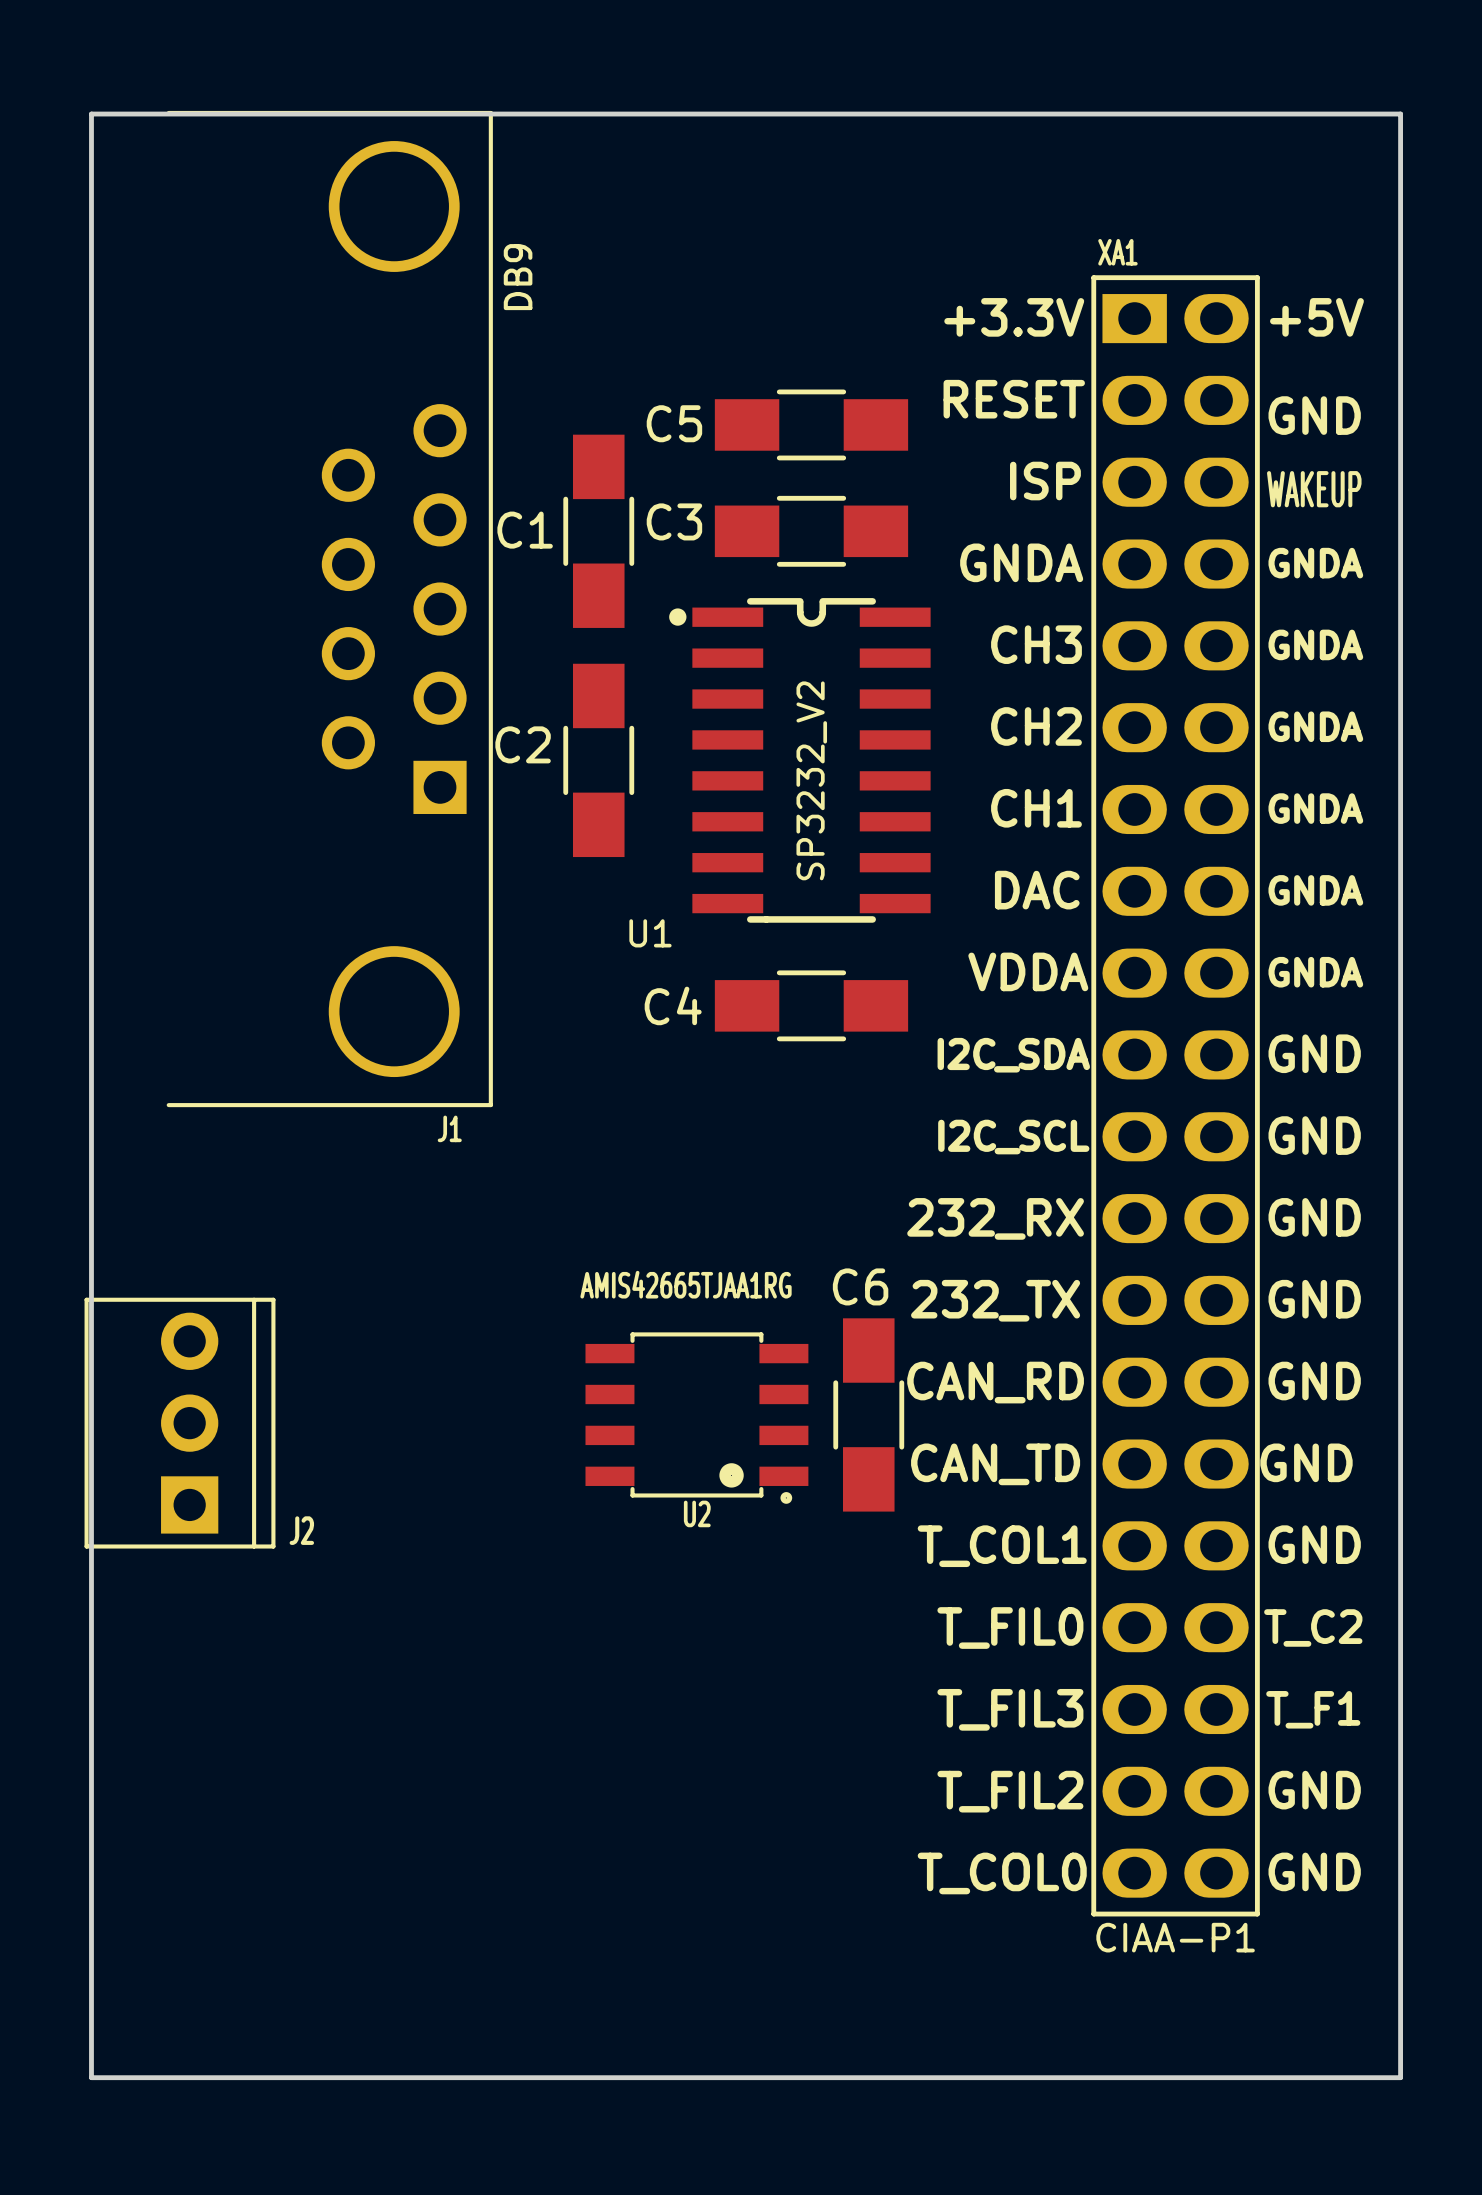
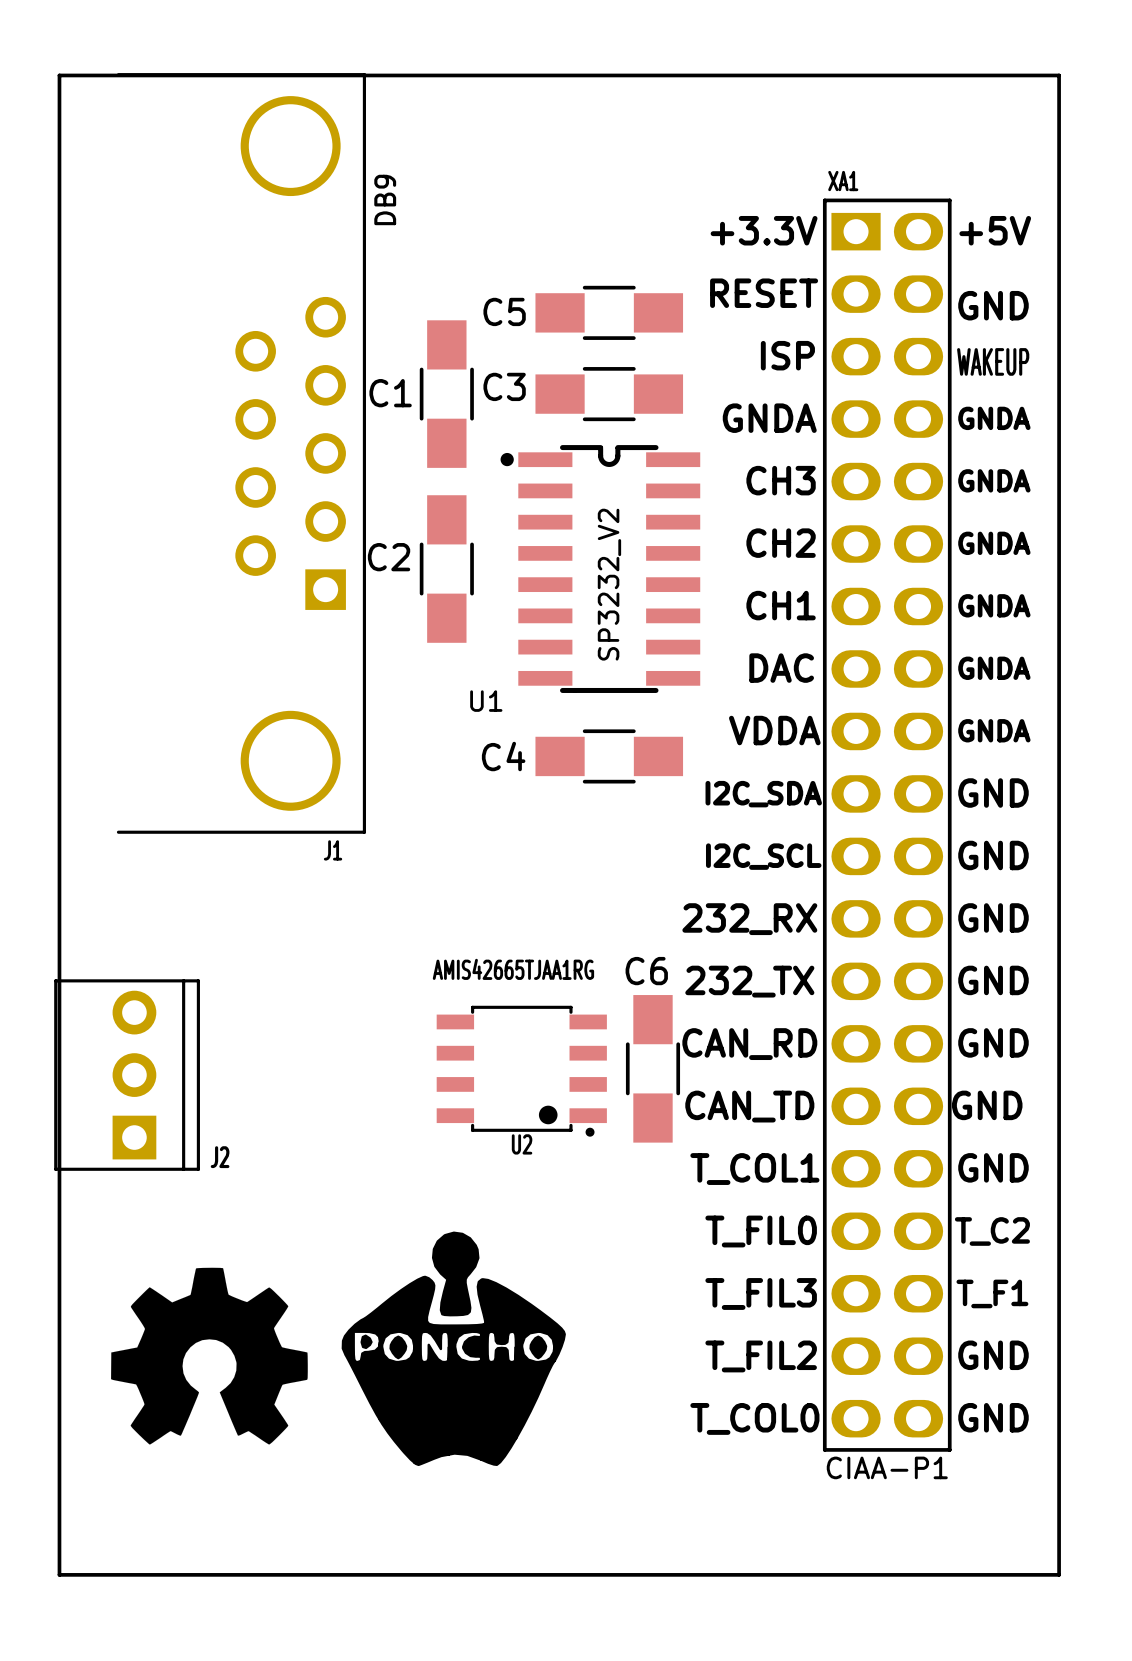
drawing: none -> [341, 1231, 566, 1467]
drawing: none -> [111, 1267, 308, 1445]

